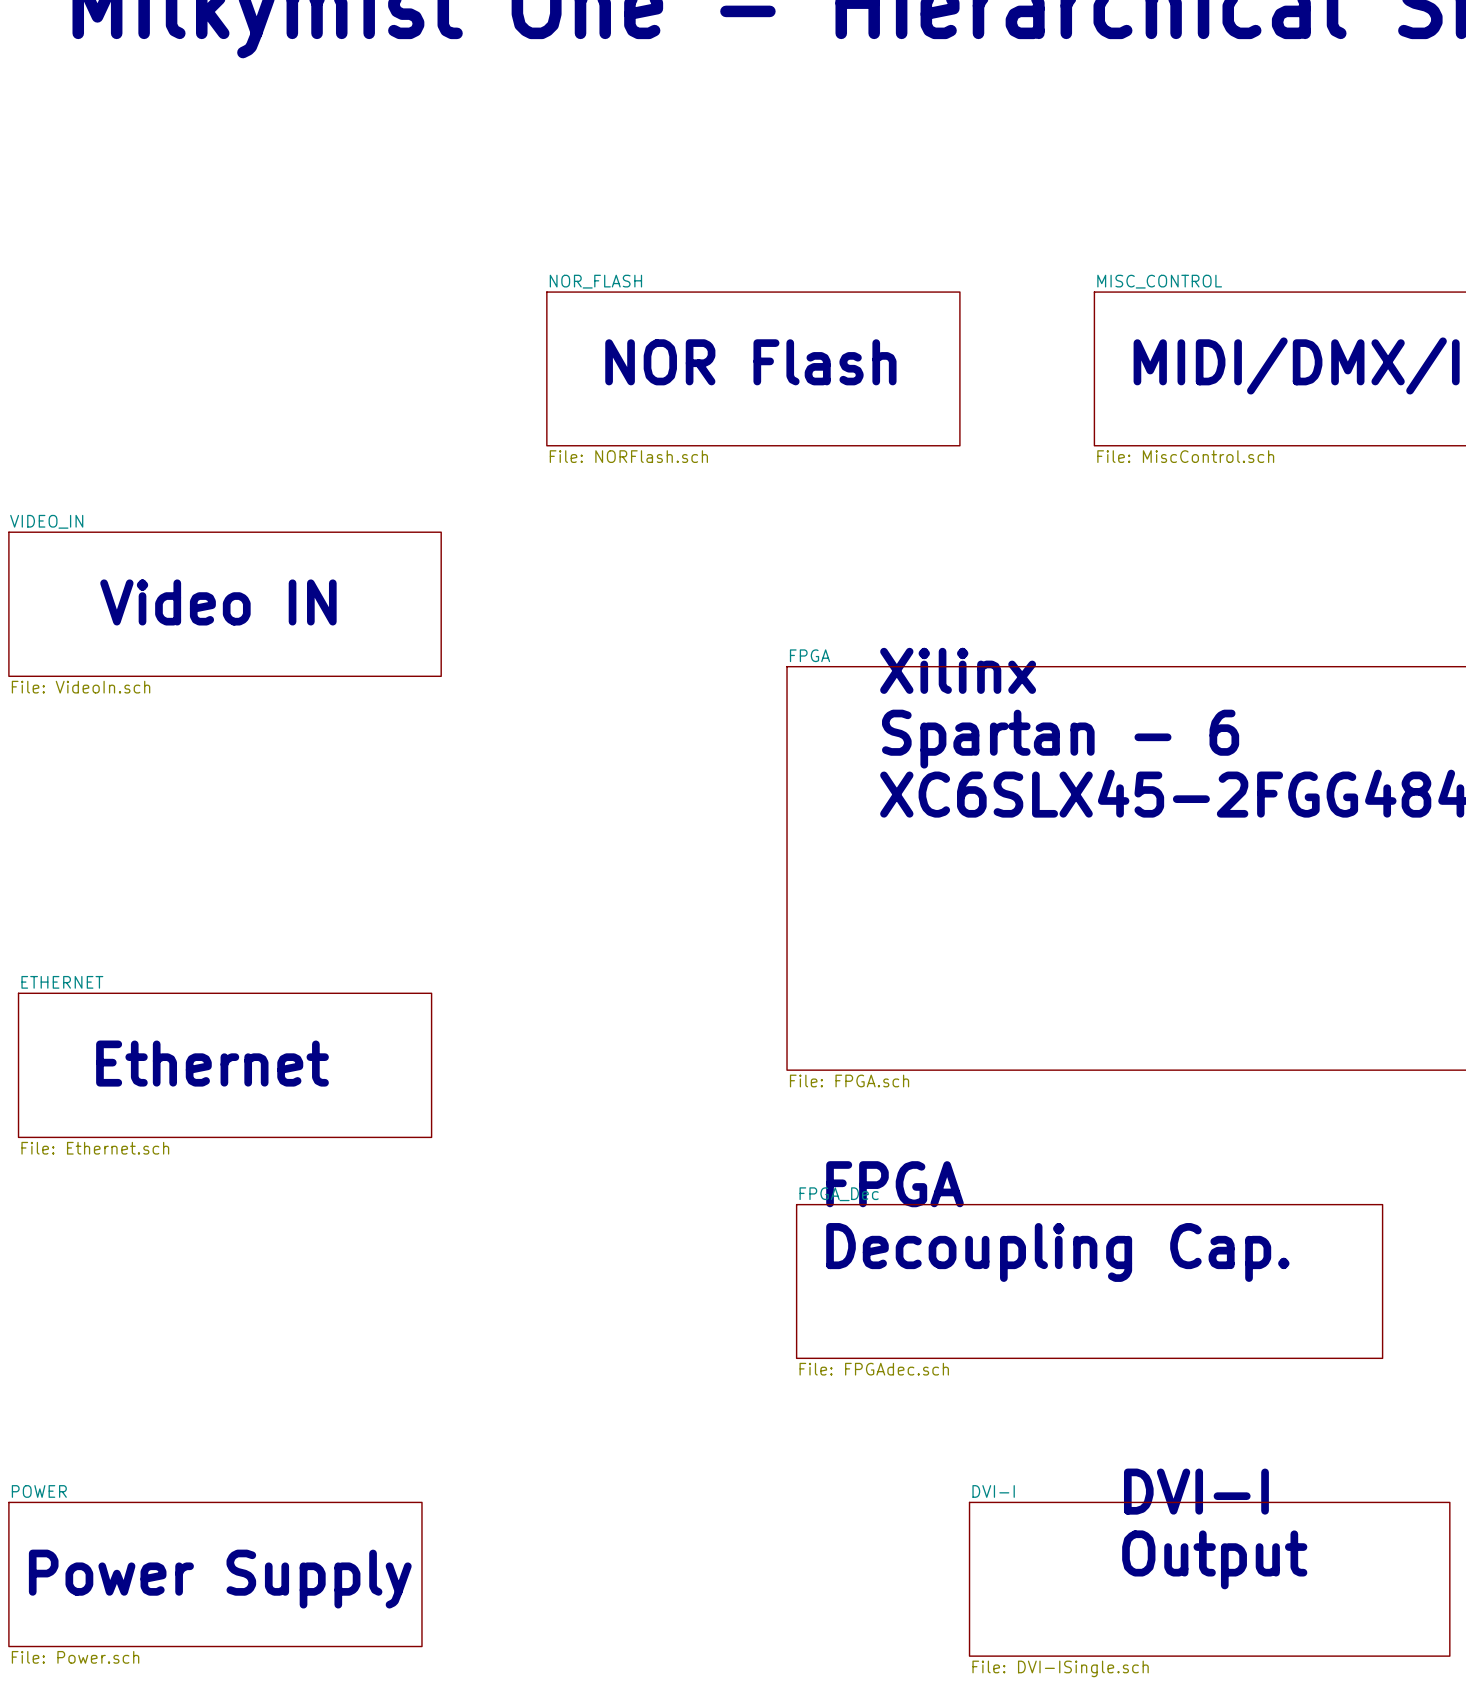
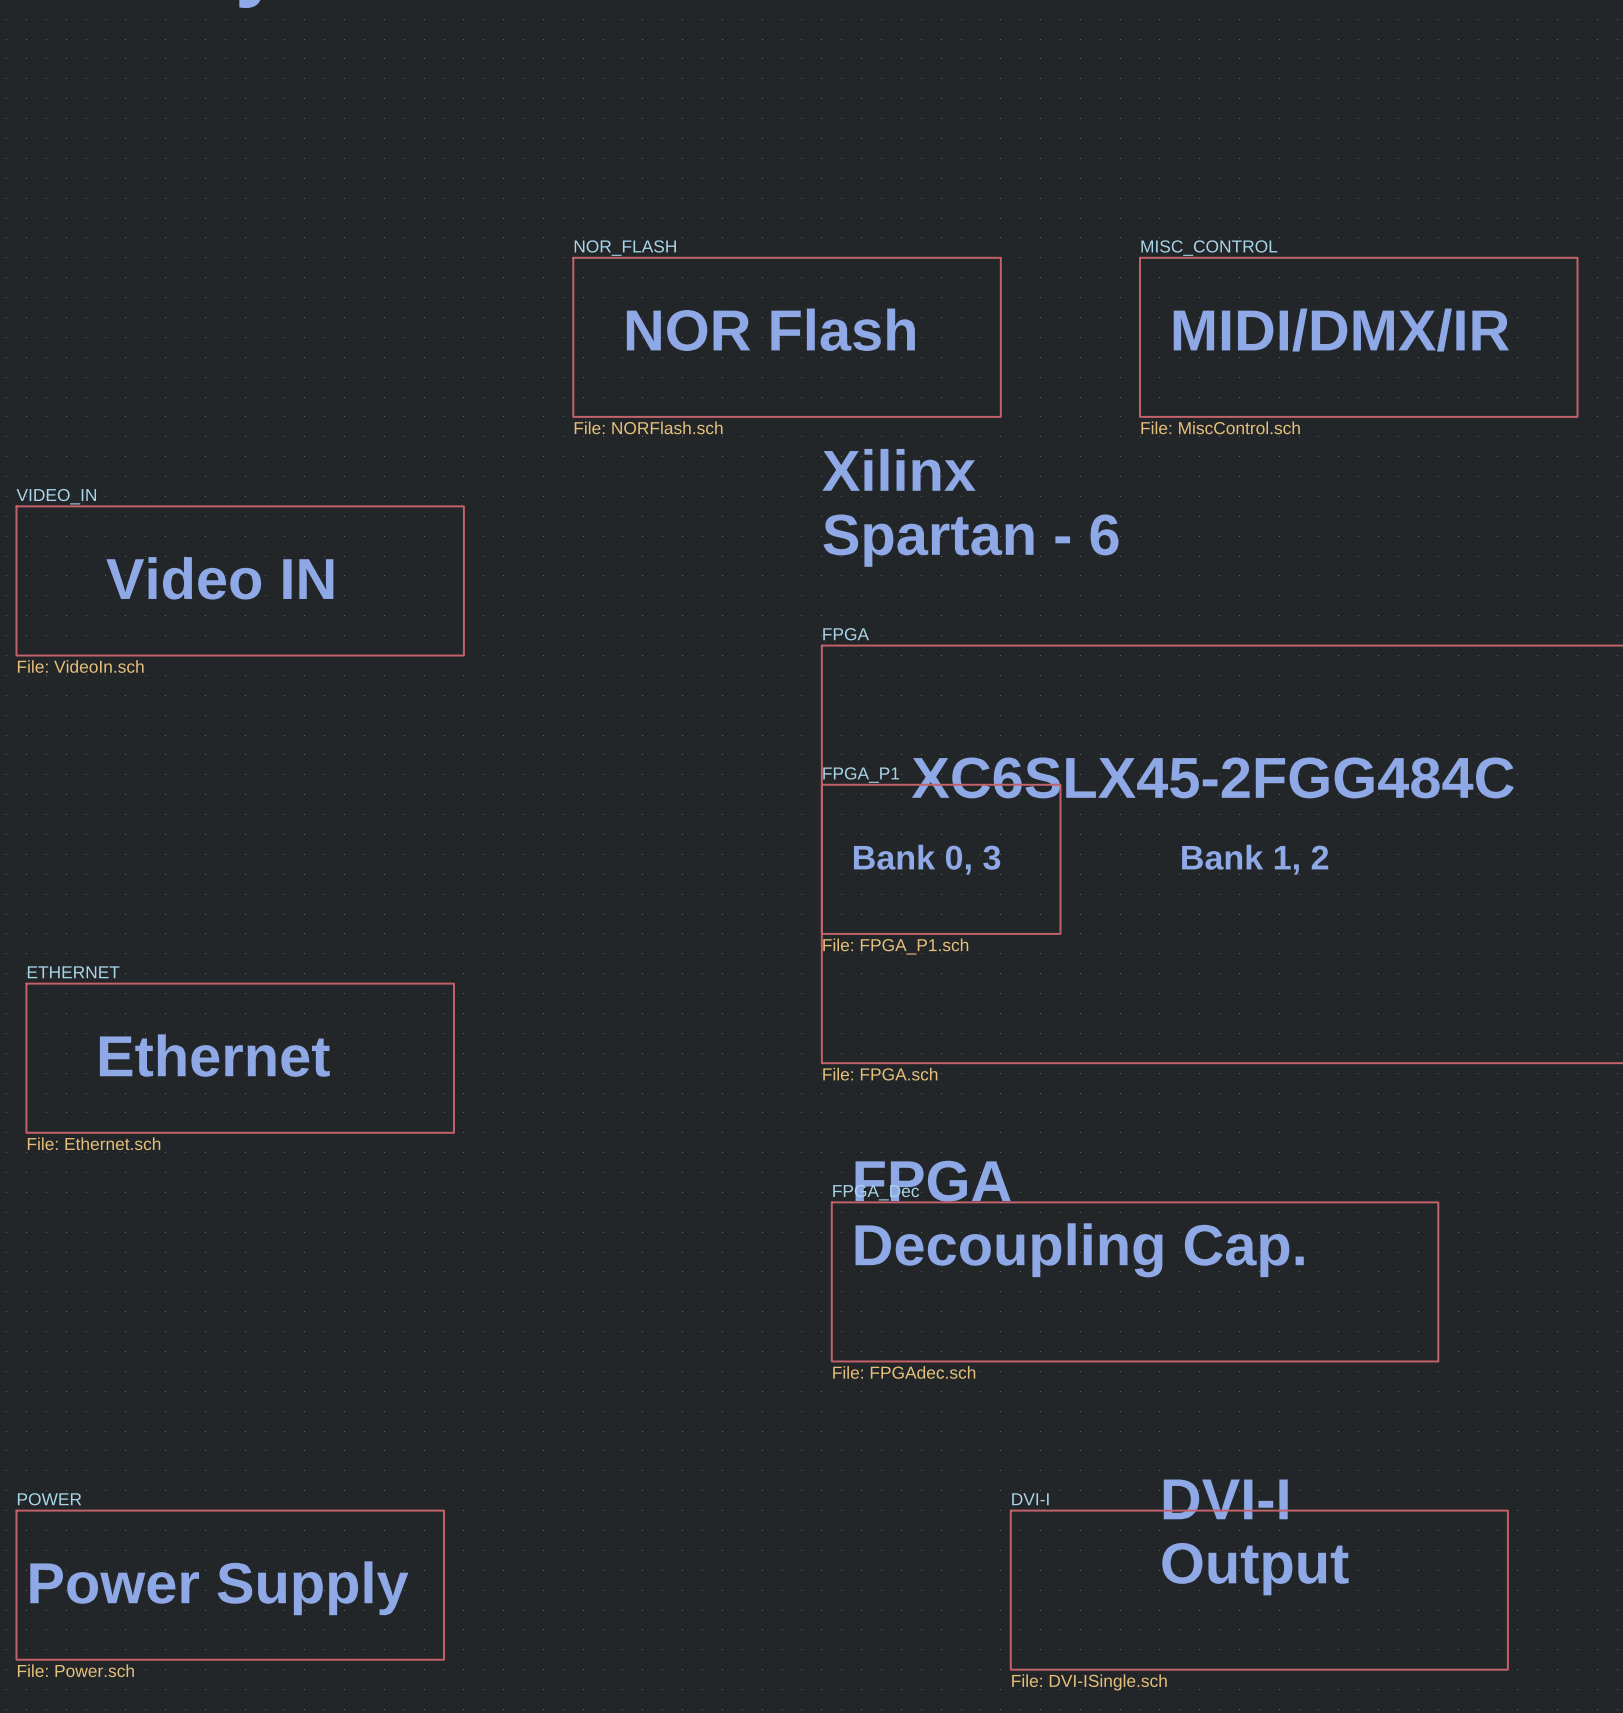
text: none -> Xilinx (899, 469)
text: none -> Spartan - 6 (971, 540)
text: Xilinx (958, 670) -> none
text: Spartan - 6 (1060, 739) -> none
sheet FPGA_P1: none -> File: FPGA_P1.sch (941, 859)
text: none -> Bank 0, 3 (927, 859)
text: none -> Bank 1, 2 (1255, 859)

